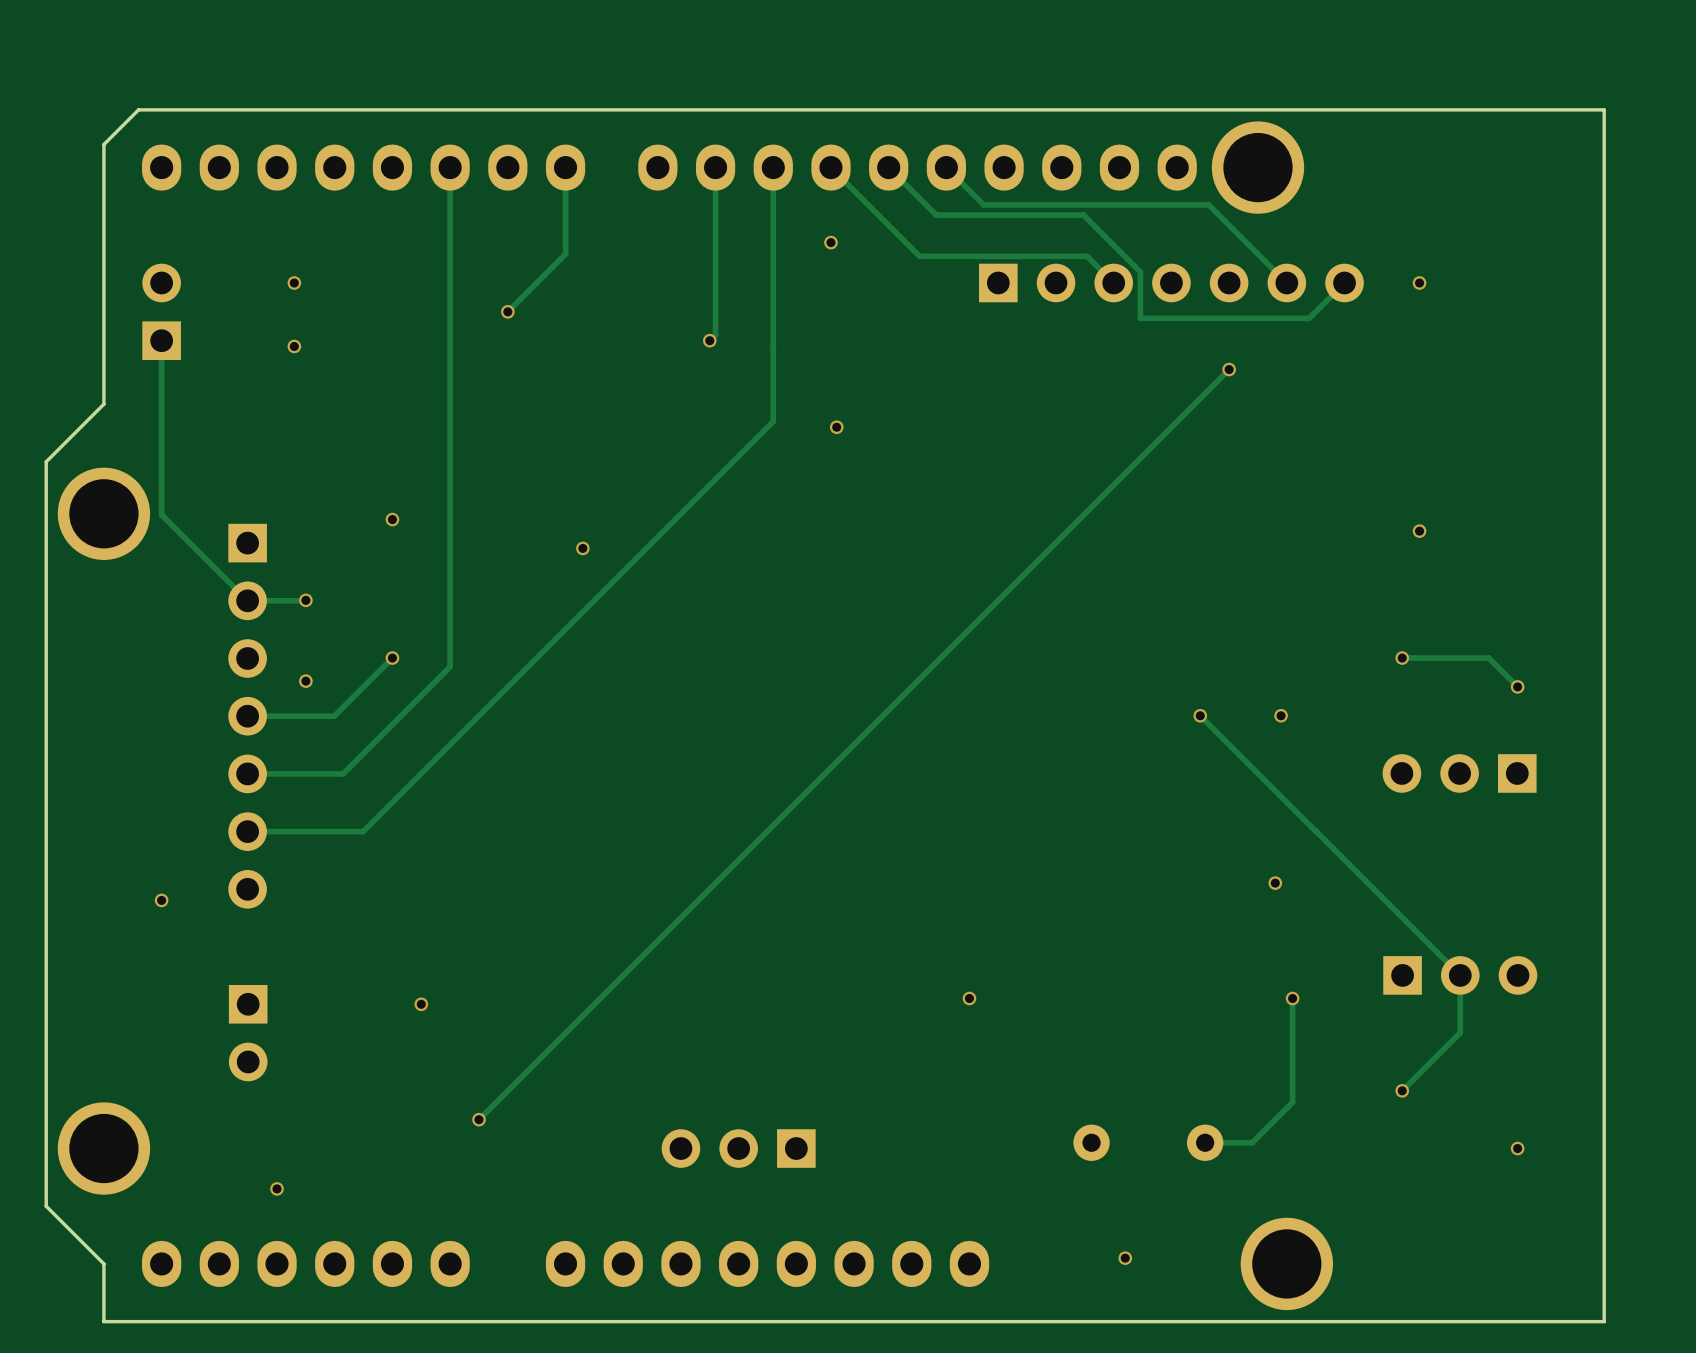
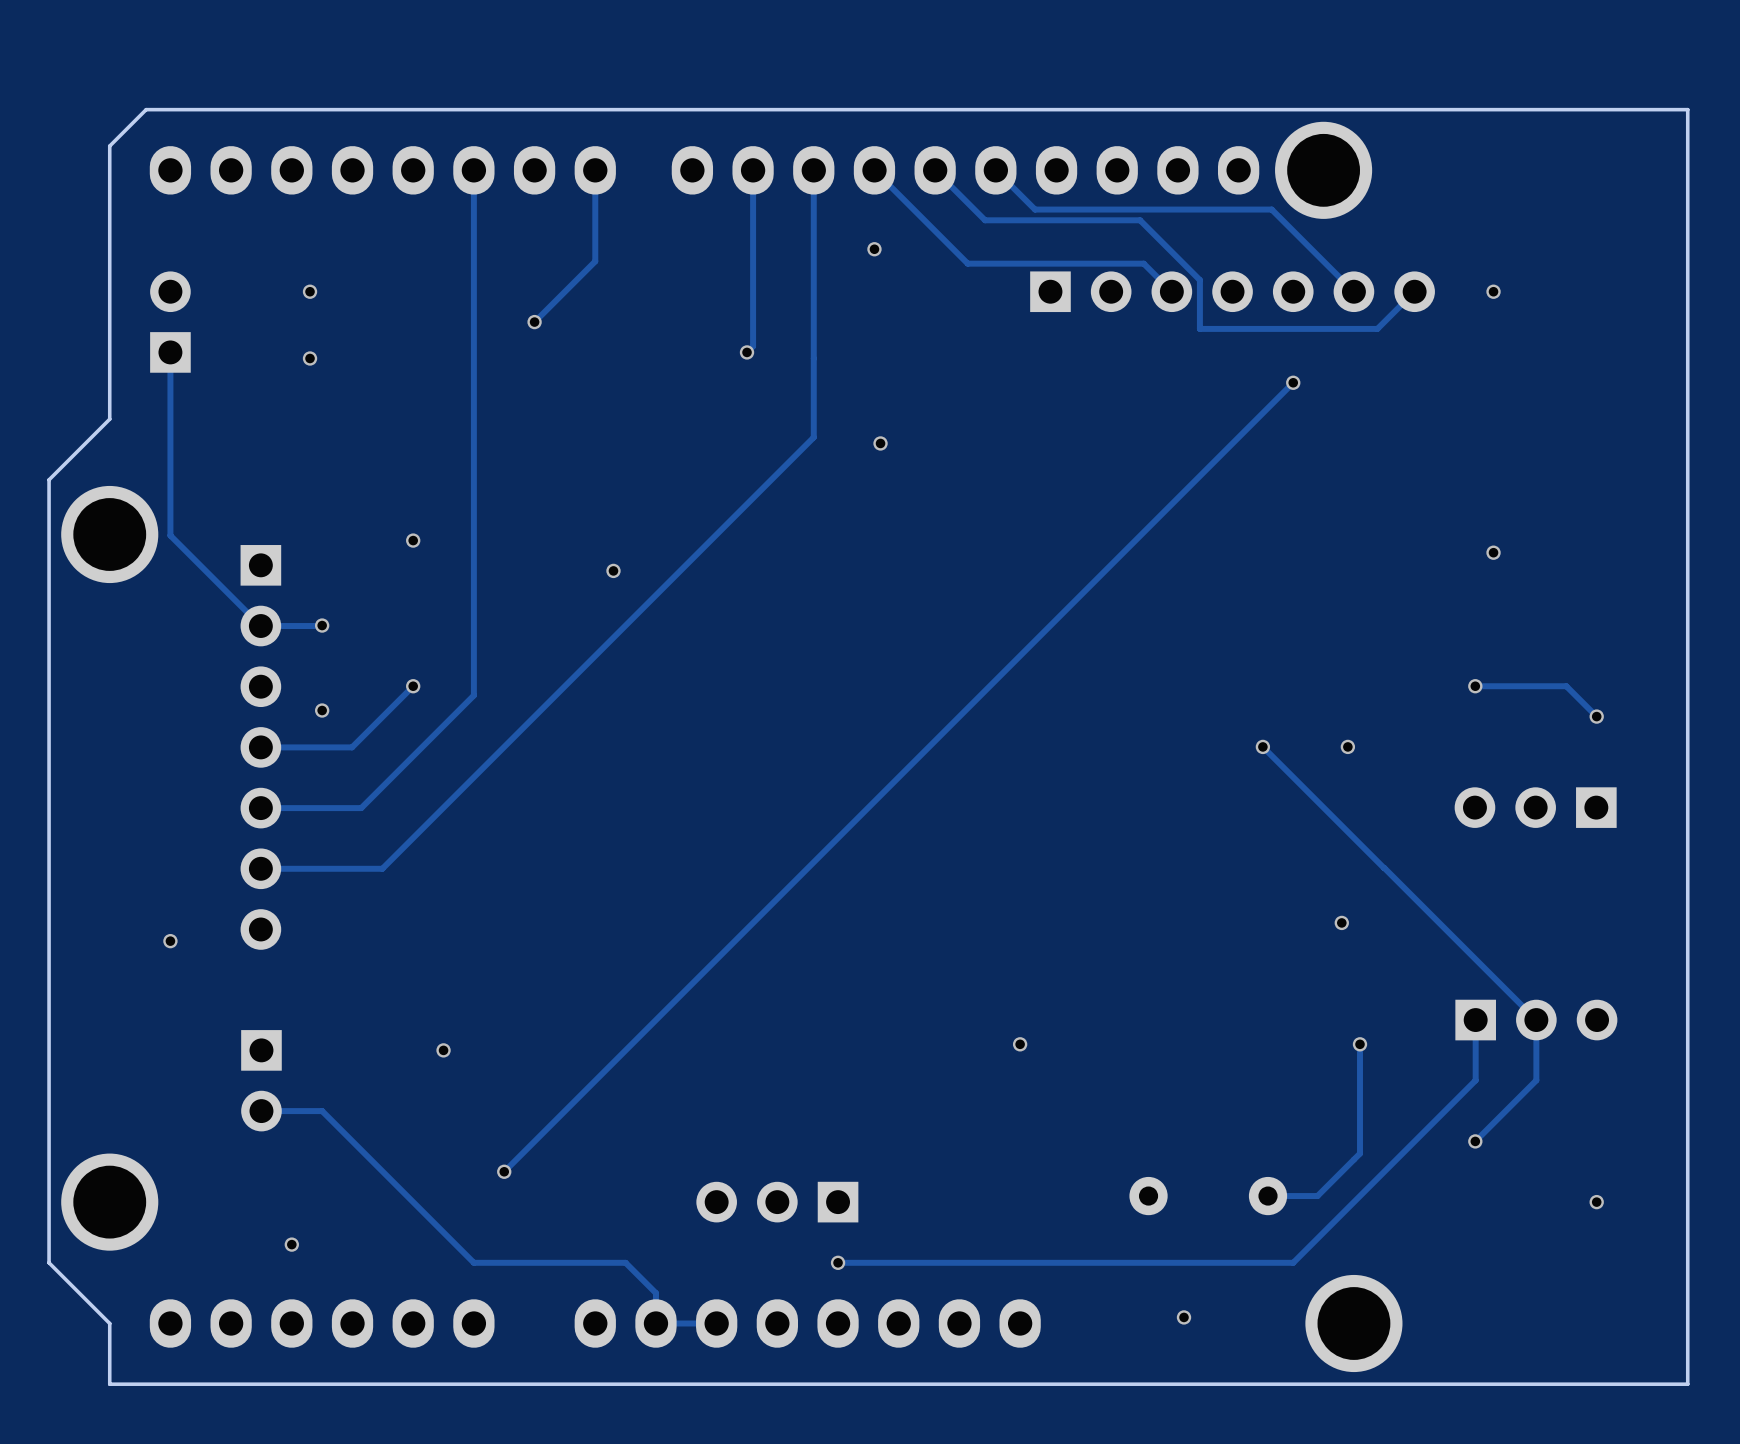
track: none -> (1475, 1020) (1475, 1080) (1293, 1262) (838, 1262)
track: none -> (261, 1111) (322, 1111) (473, 1262) (625, 1262) (655, 1293) (655, 1323) (716, 1323)
via: none -> (838, 1262)

